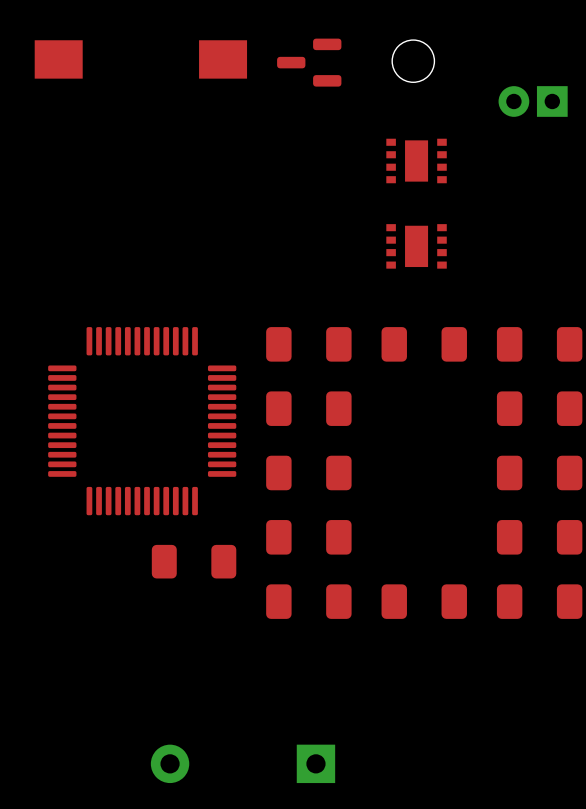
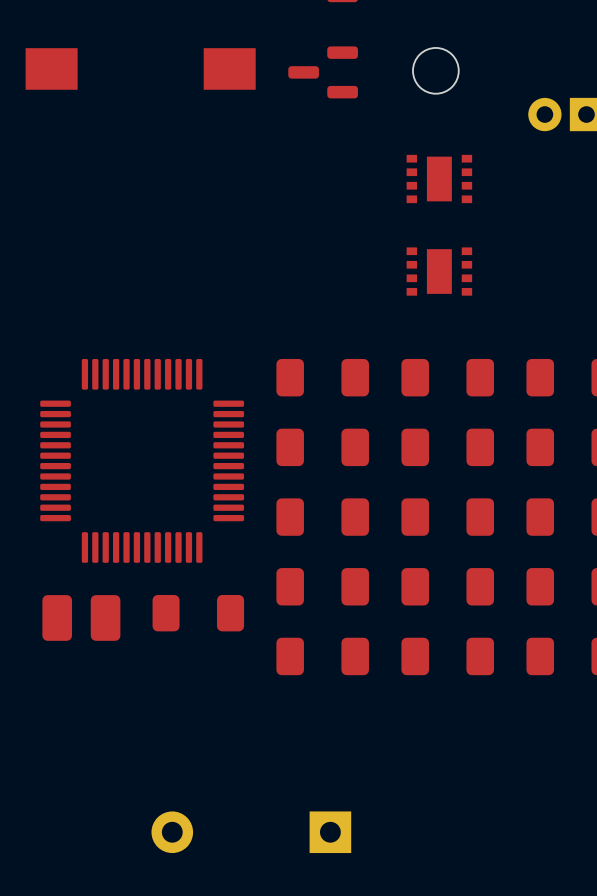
part: none -> (447, 447)
part: none -> (447, 517)
part: none -> (447, 586)
part: none -> (81, 617)

